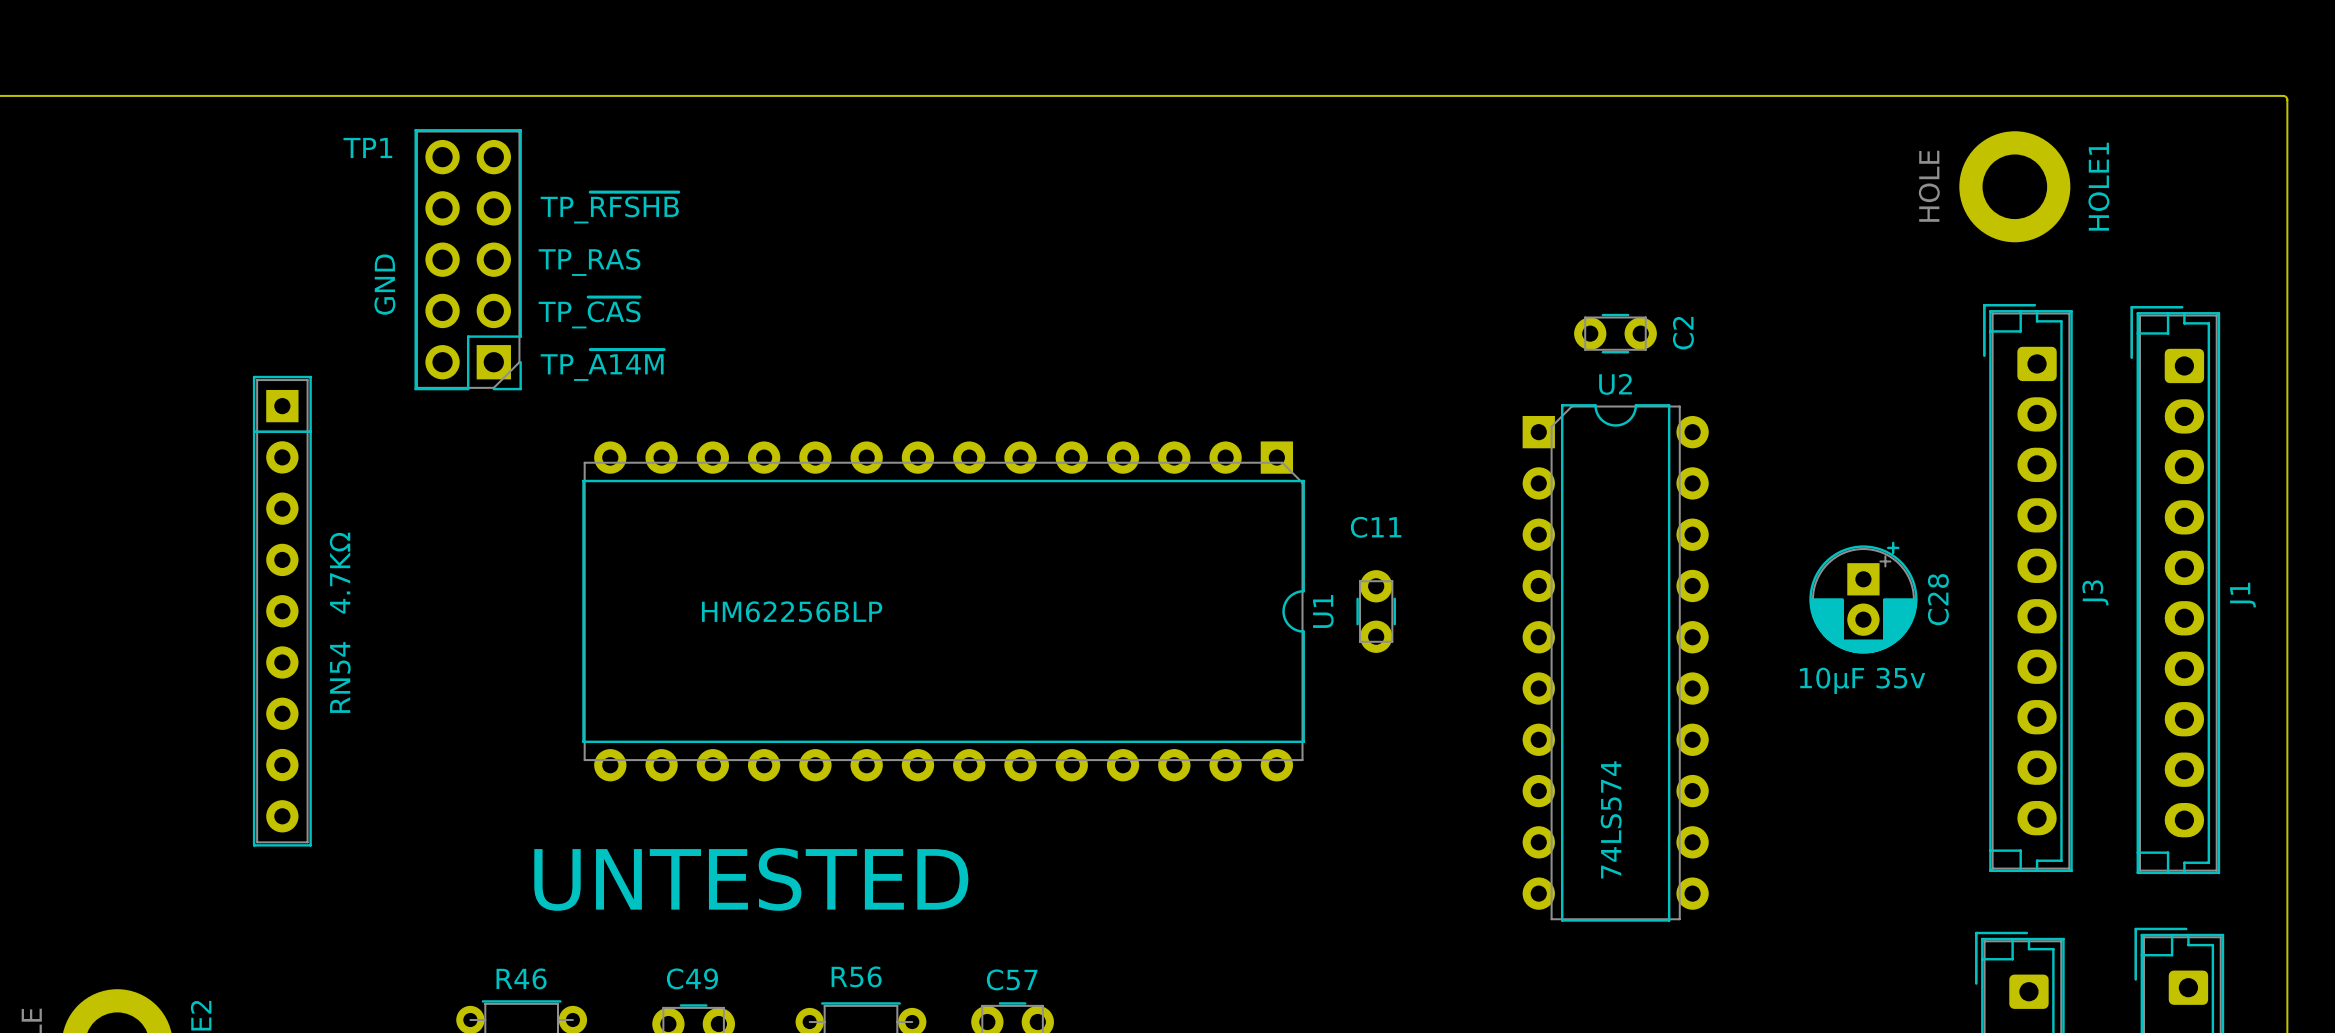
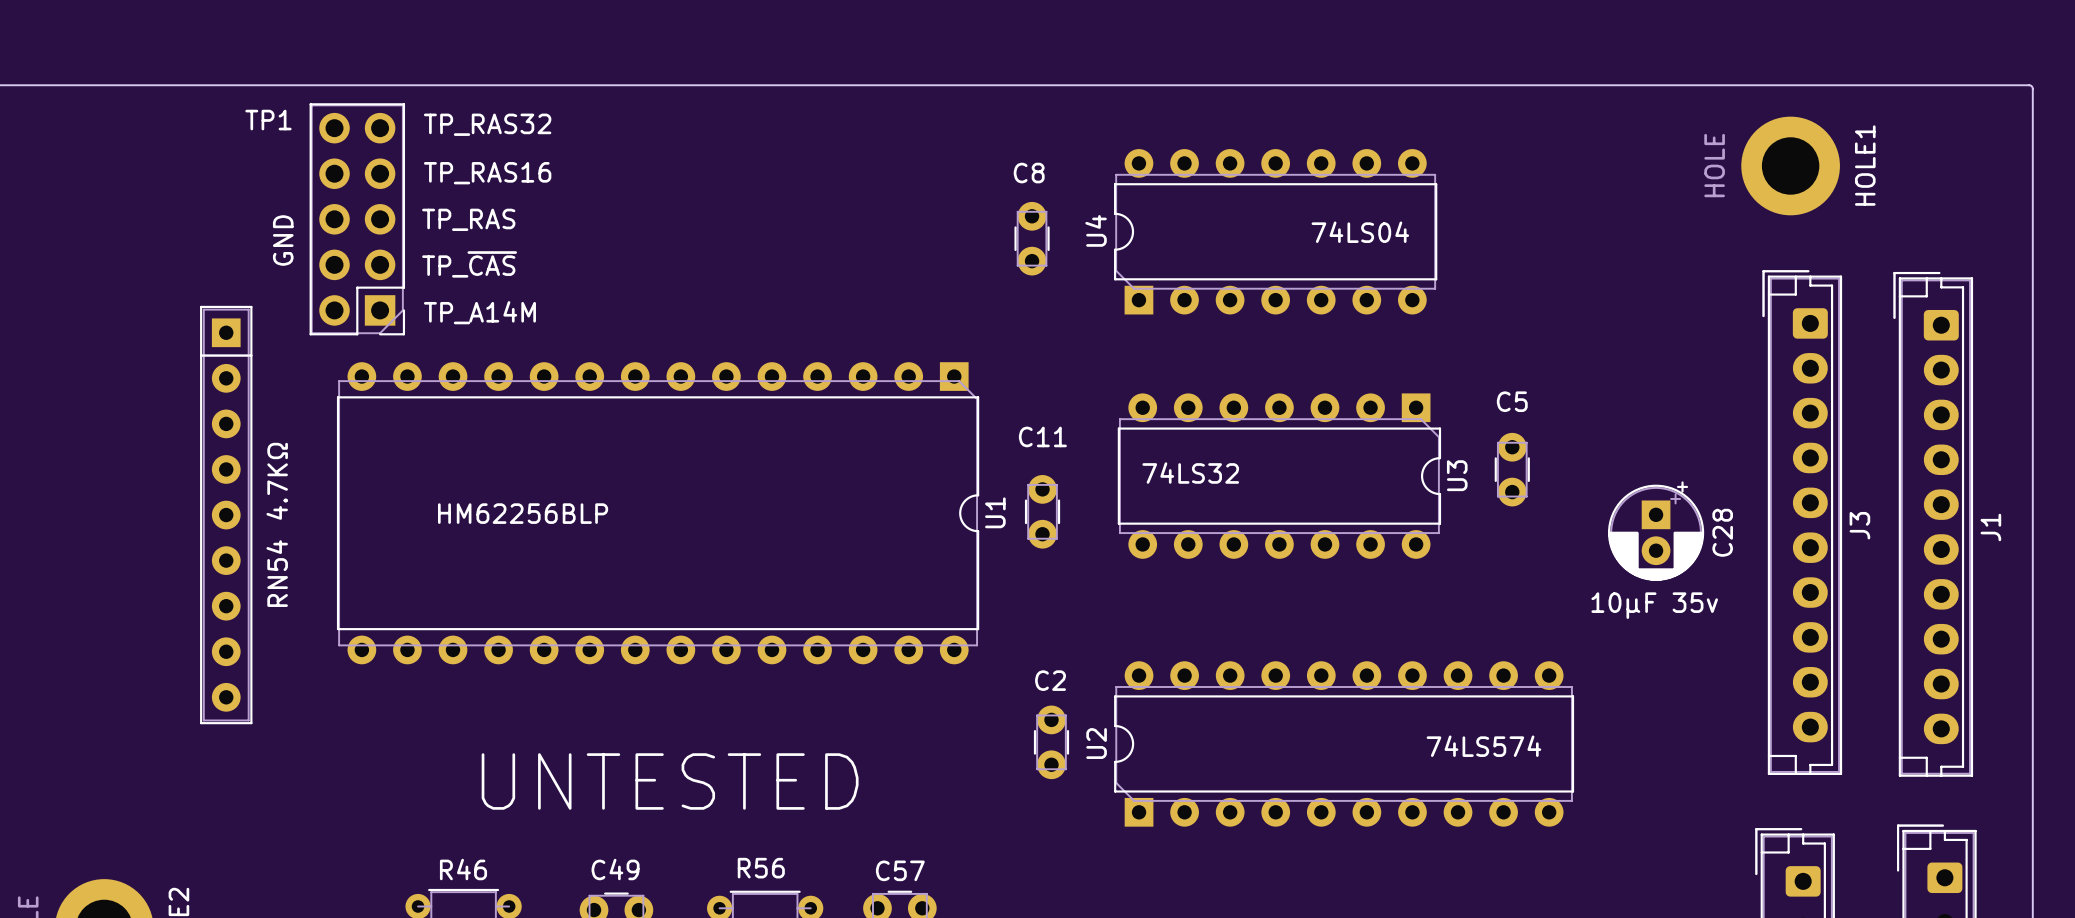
text: none -> TP_RAS32 (487, 124)
text: none -> TP_RAS16 (487, 173)
text: TP_~{RFSHB} (609, 207) -> none
TP1 position: (468, 259) -> (357, 219)
U4: none -> 74LS04 (1275, 231)
text position: TP_RAS (589, 262) -> TP_RAS (468, 219)
C8: none -> (1032, 238)
text position: GND (384, 284) -> GND (283, 240)
text position: TP_~{CAS} (589, 312) -> TP_~{CAS} (469, 264)
C2 rotation: 0° (1615, 333) -> 90° clockwise (1051, 742)
C2 position: (1615, 333) -> (1051, 742)
C2 name position: C2 (1683, 333) -> C2 (1050, 680)
text: TP_~{A14M} (602, 365) -> TP_A14M (479, 312)
C5: none -> (1512, 469)
U3: none -> 74LS32 (1279, 476)
RN54 position: (282, 611) -> (226, 515)
U1 position: (943, 611) -> (658, 513)
C11 position: (1376, 611) -> (1042, 511)
U2 rotation: 0° (1615, 662) -> 90° counterclockwise (1344, 743)

